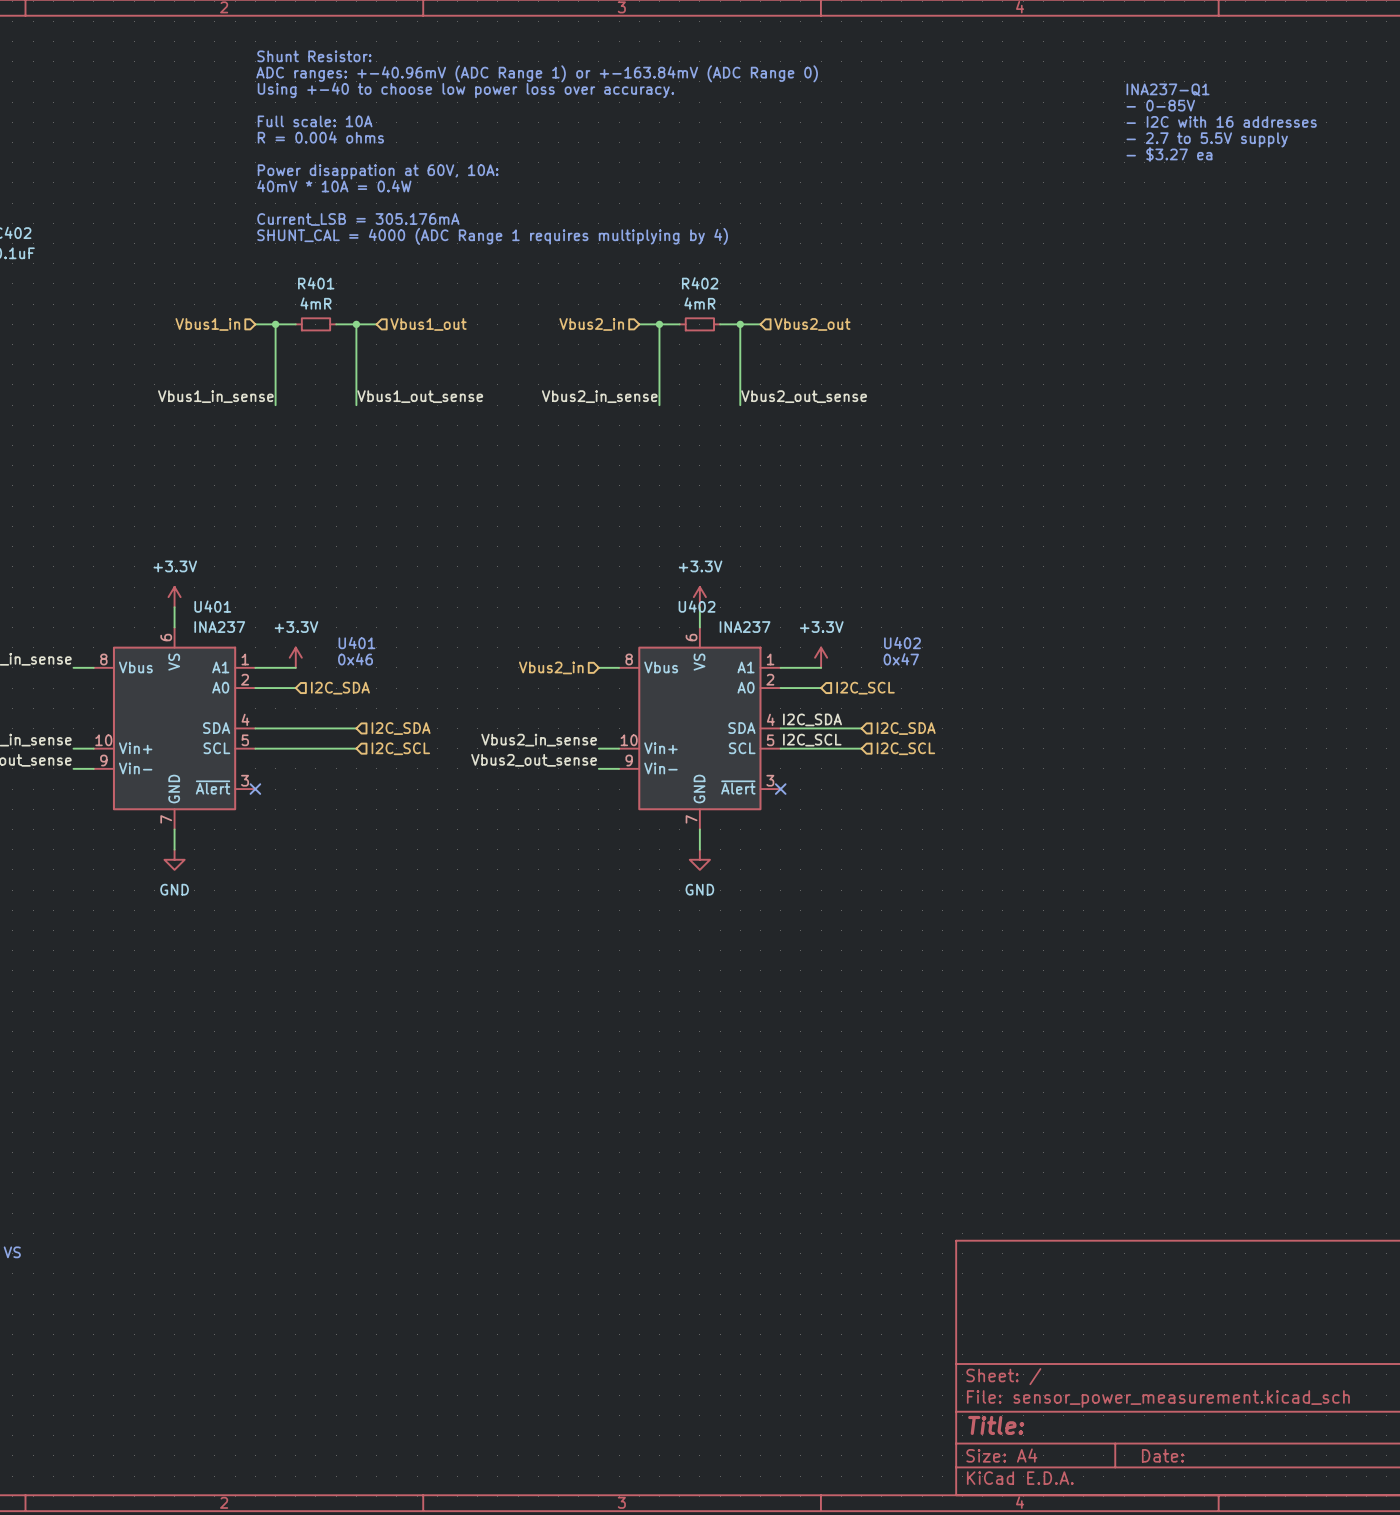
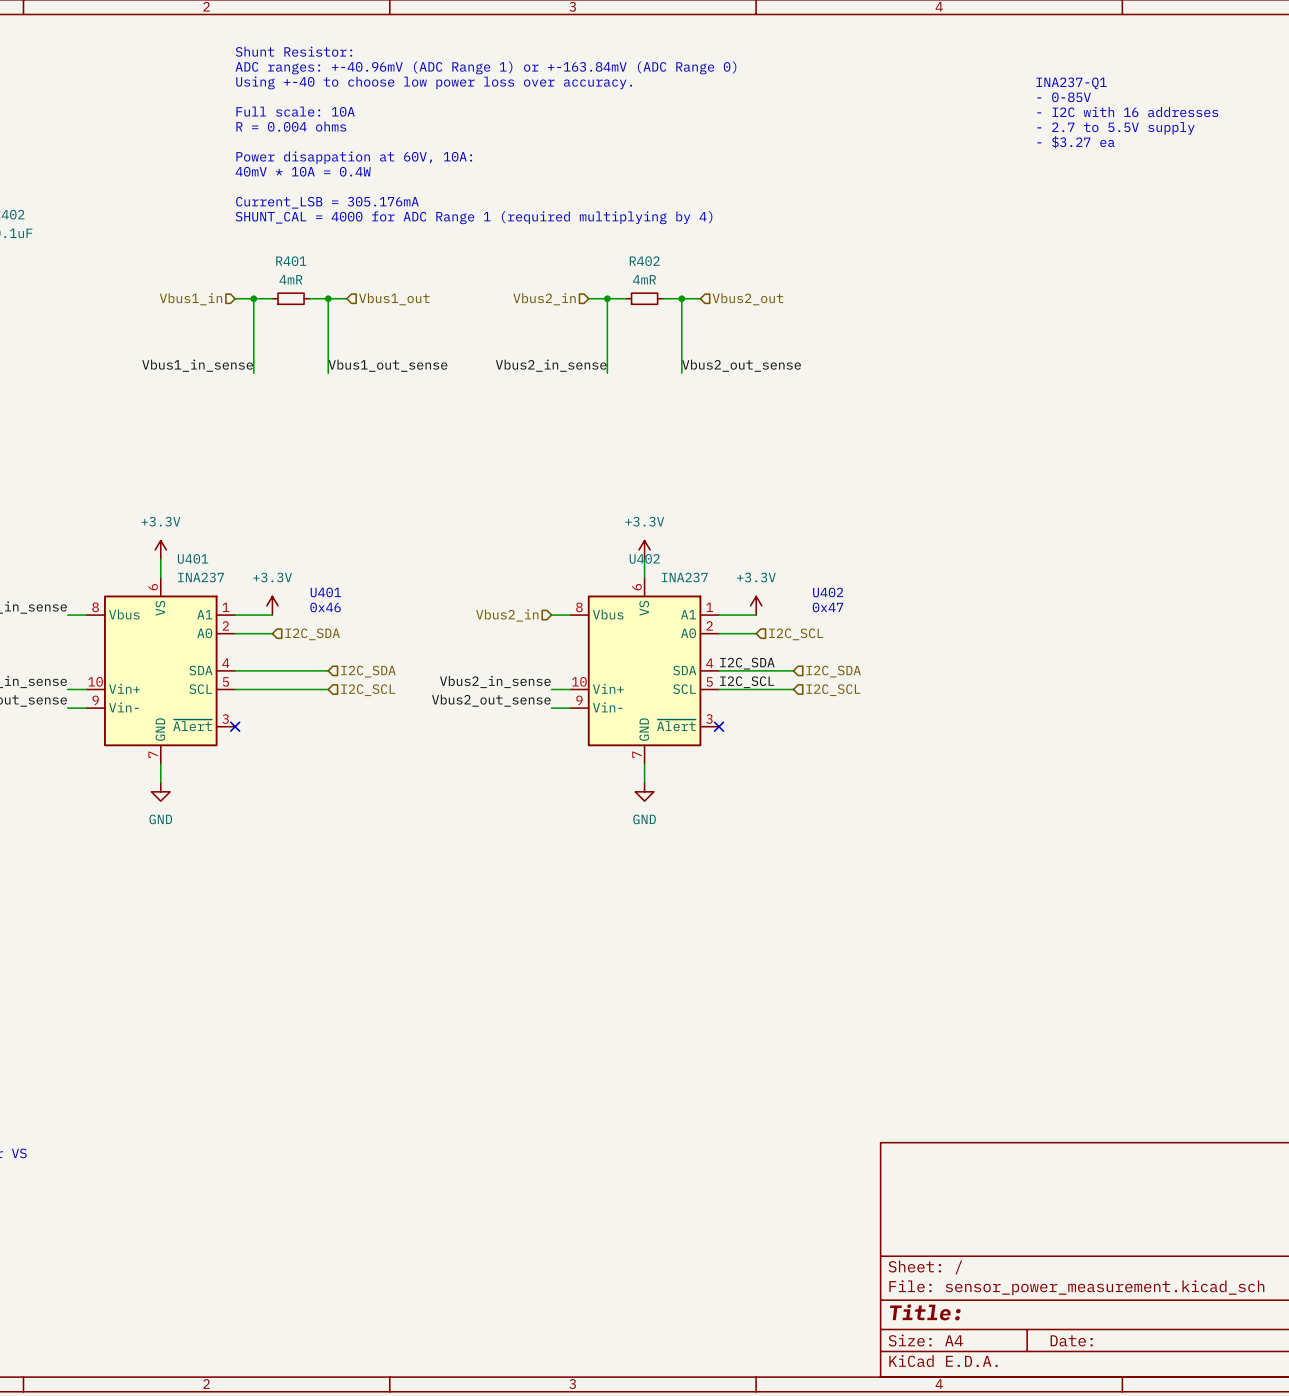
text: SHUNT_CAL = 4000 (ADC Range 1 requires multiplying by 4) (492, 236) -> SHUNT_CAL = 4000 for ADC Range 1 (required multiplying by 4) (474, 217)

